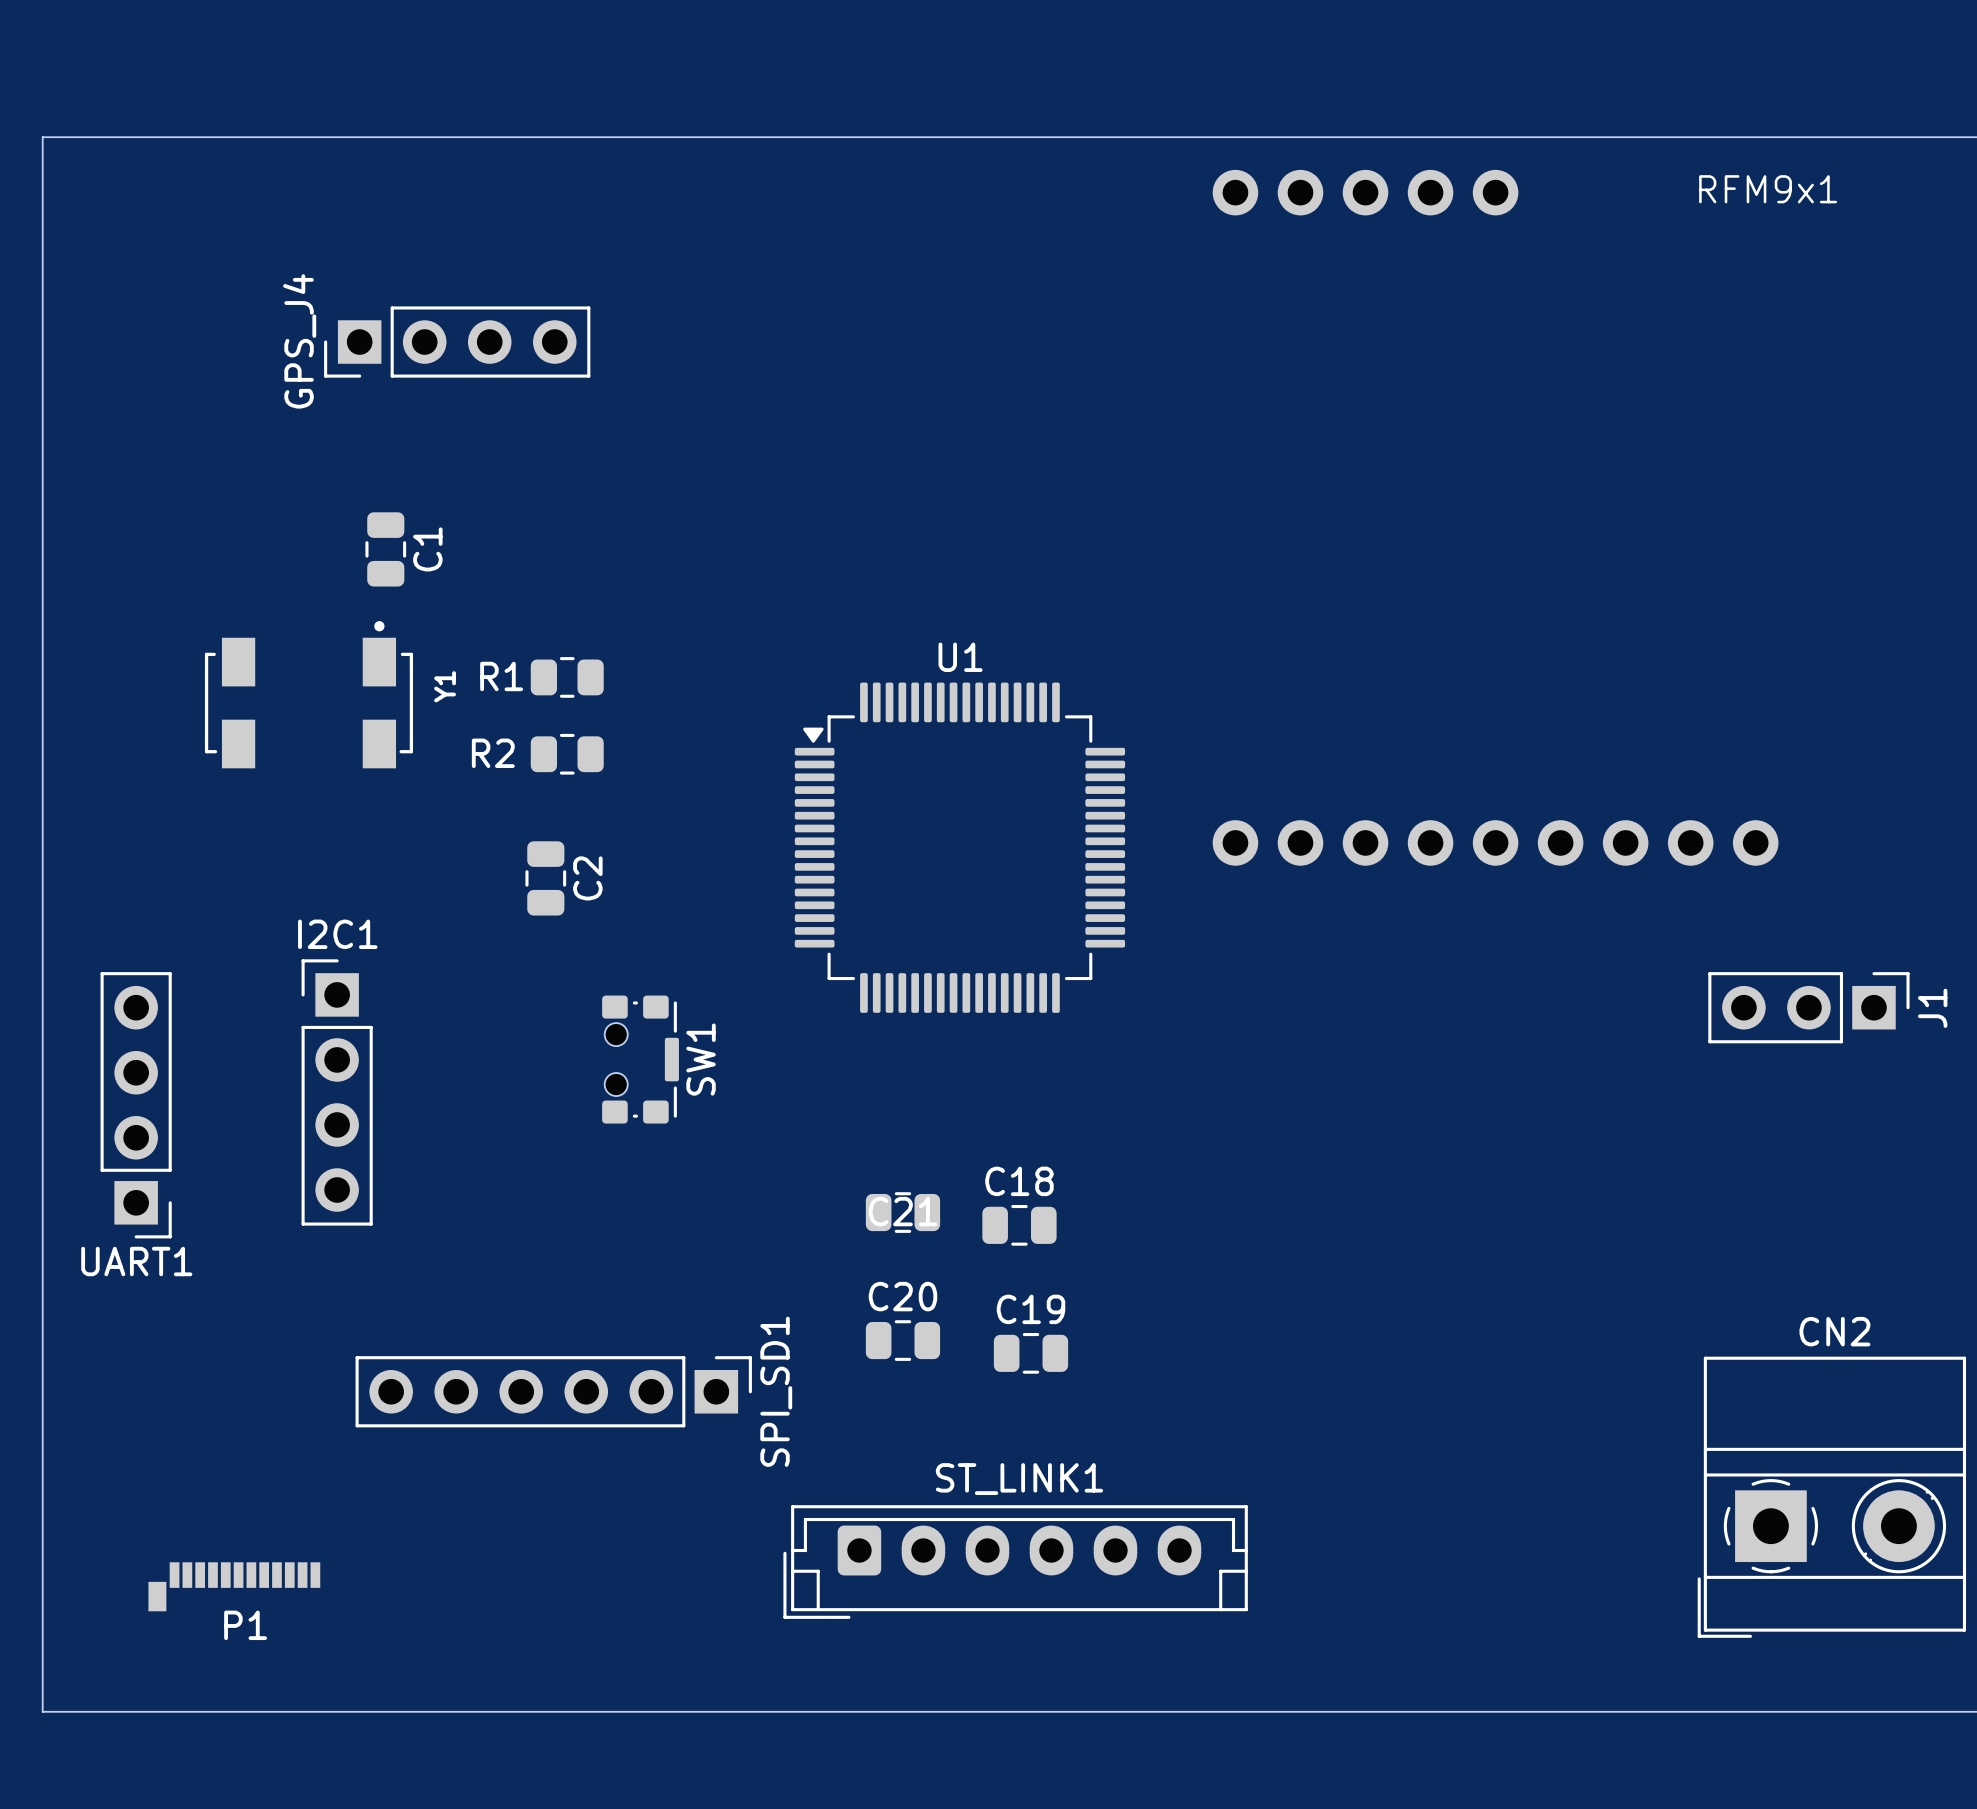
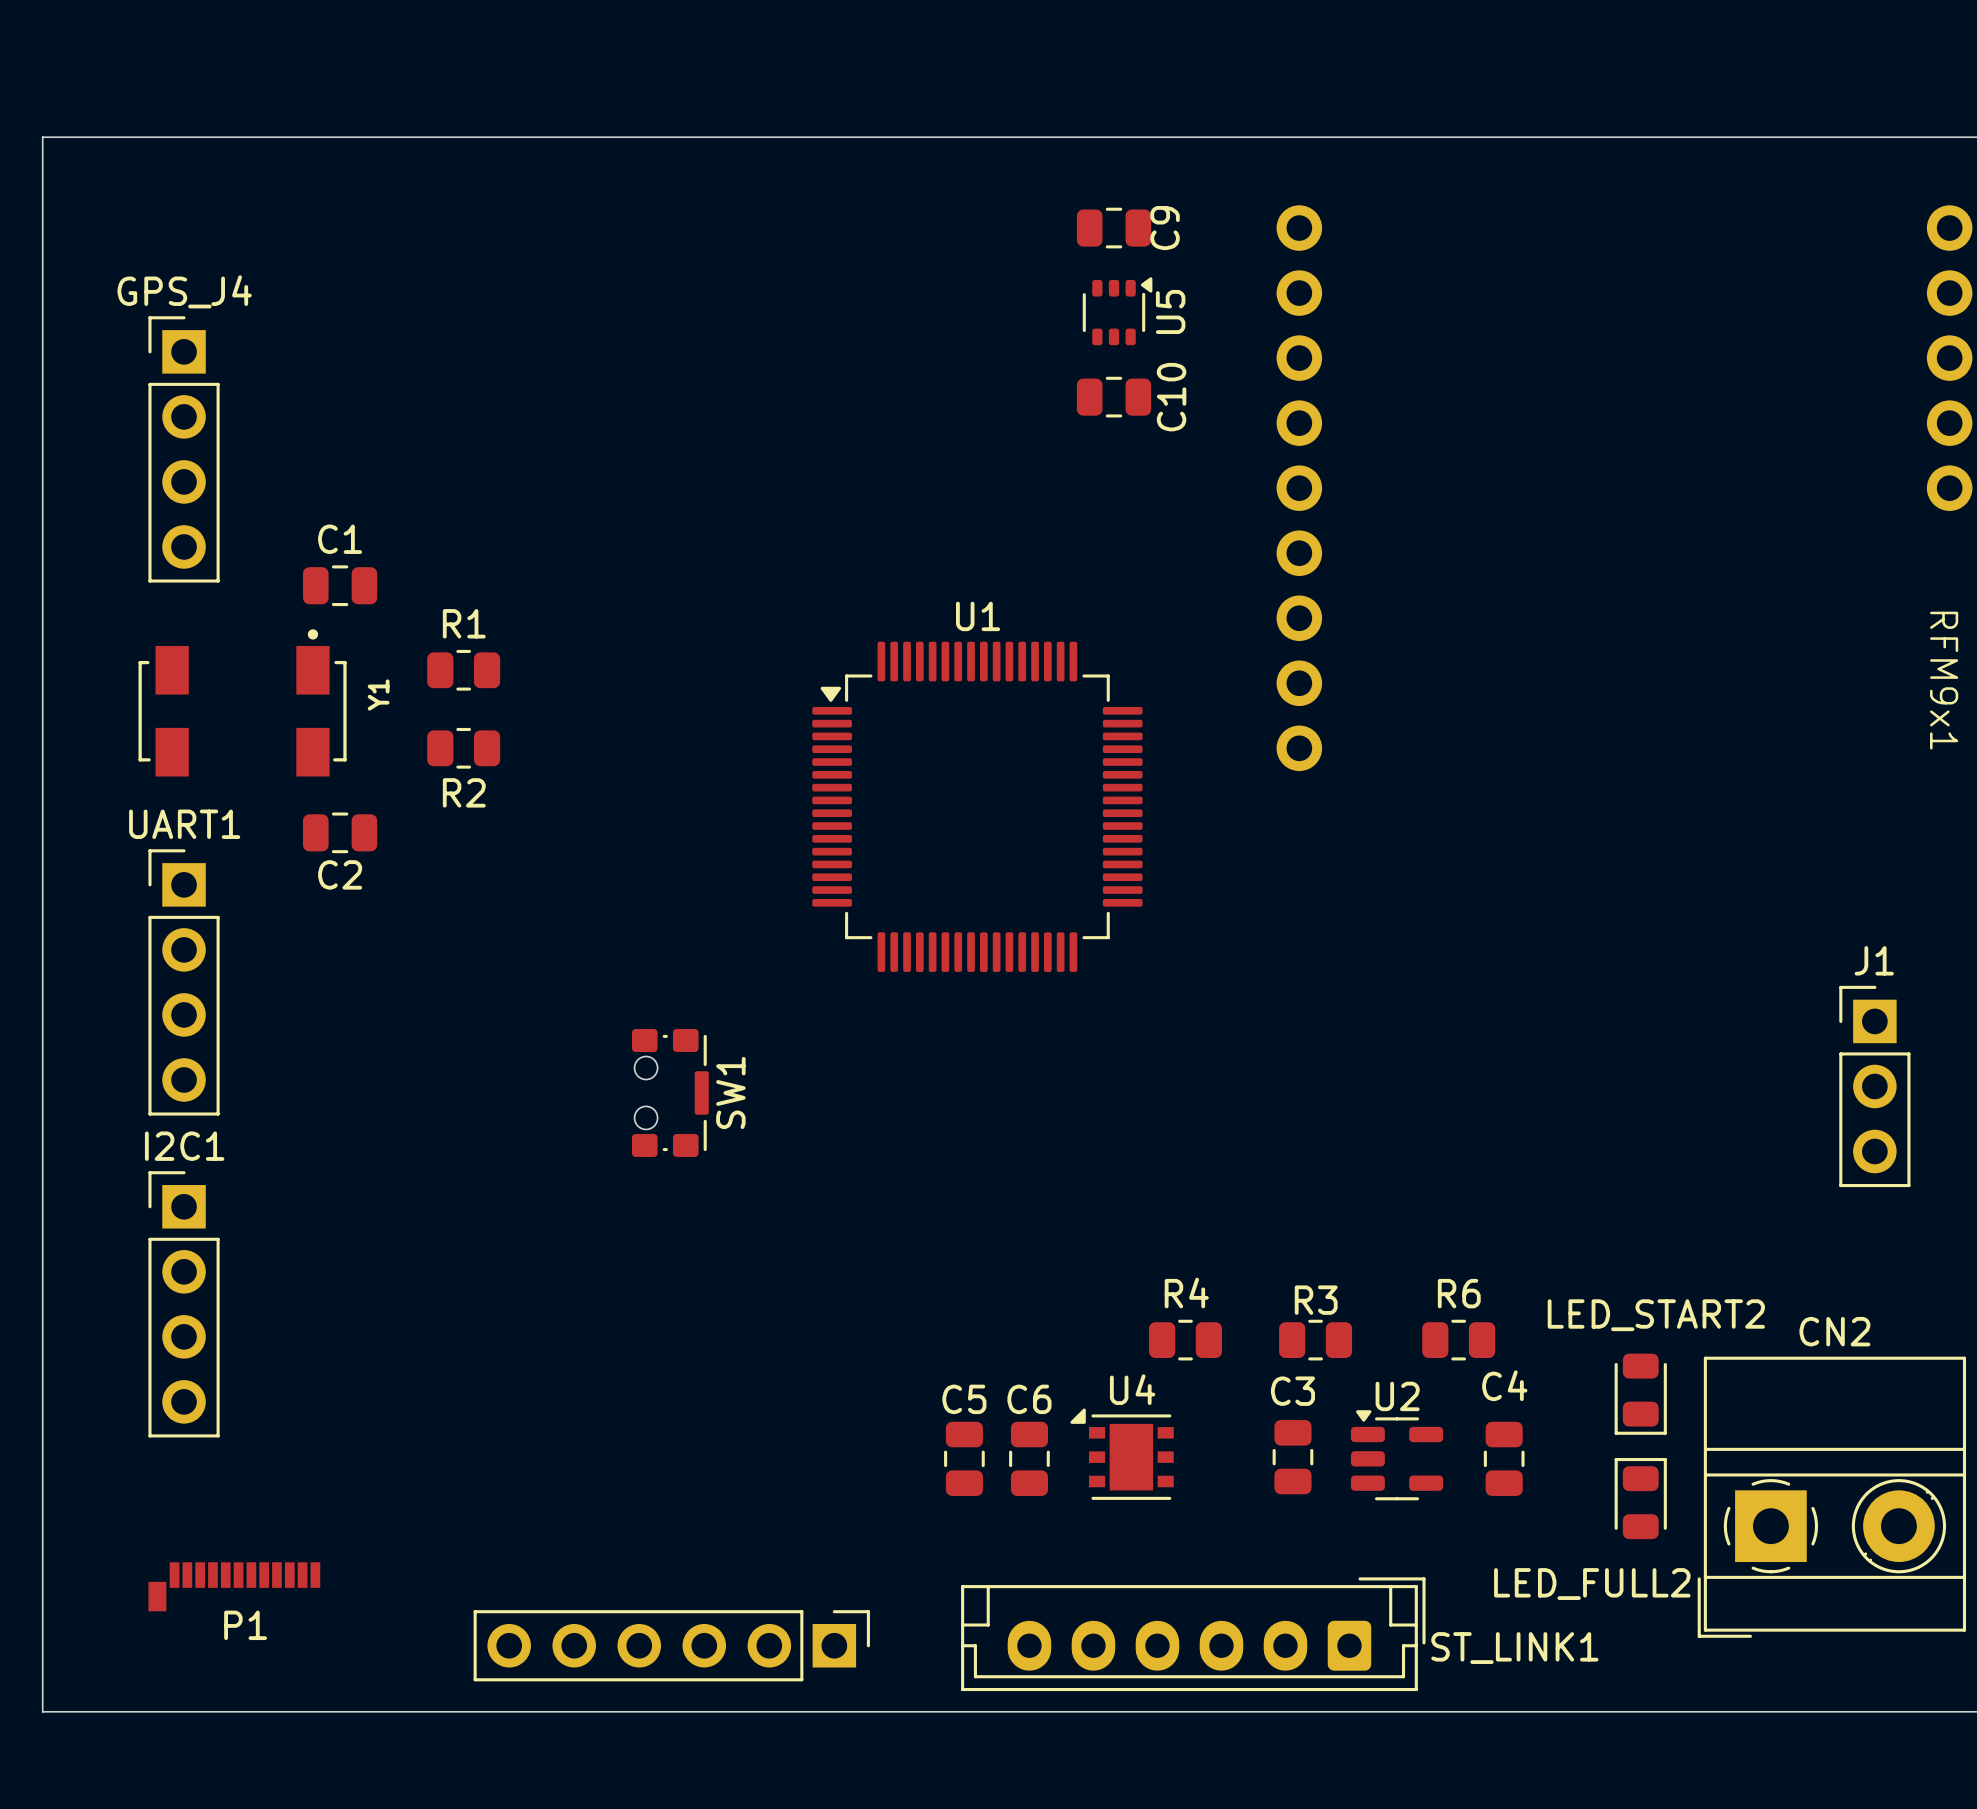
RFM9x1 name position: RFM9x1 (1768, 189) -> RFM9x1 (1944, 680)
C9: none -> (1113, 228)
U5: none -> (1117, 311)
GPS_J4 rotation: 0° (457, 342) -> 90° clockwise (184, 449)
GPS_J4 position: (457, 342) -> (184, 449)
C10: none -> (1113, 397)
RFM9x1 rotation: 0° (1495, 517) -> 90° clockwise (1624, 488)
C1 rotation: 0° (385, 549) -> 90° clockwise (340, 585)
C1 position: (385, 549) -> (340, 585)
C1 name position: C1 (427, 549) -> C1 (340, 539)
R1 name position: R1 (501, 676) -> R1 (464, 623)
R1 position: (567, 677) -> (463, 670)
Y1 position: (308, 694) -> (242, 702)
R2 name position: R2 (493, 753) -> R2 (464, 792)
R2 position: (567, 754) -> (463, 748)
U1 position: (959, 847) -> (977, 806)
C2 rotation: 0° (545, 878) -> 90° clockwise (340, 832)
C2 position: (545, 878) -> (340, 832)
J1 rotation: 0° (1808, 1007) -> 90° counterclockwise (1874, 1086)
SW1 position: (640, 1059) -> (670, 1092)
I2C1 position: (337, 1092) -> (184, 1304)
UART1 rotation: 0° (136, 1105) -> 180° (184, 982)
part: (902, 1212) -> none
C18: (1019, 1225) -> none
C20: (902, 1340) -> none
R4: none -> (1185, 1340)
R3: none -> (1315, 1340)
R6: none -> (1458, 1340)
C19: (1030, 1353) -> none
SPI_SD1: (553, 1391) -> none
LED_START2: none -> (1640, 1394)
U4: none -> (1122, 1454)
U2: none -> (1397, 1455)
C3: none -> (1292, 1457)
C5: none -> (964, 1458)
C6: none -> (1029, 1458)
C4: none -> (1504, 1458)
ST_LINK1 name position: ST_LINK1 (1019, 1479) -> ST_LINK1 (1514, 1648)
LED_FULL2: none -> (1640, 1498)
ST_LINK1 rotation: 0° (1015, 1562) -> 180° (1193, 1634)
part: none -> (671, 1645)

